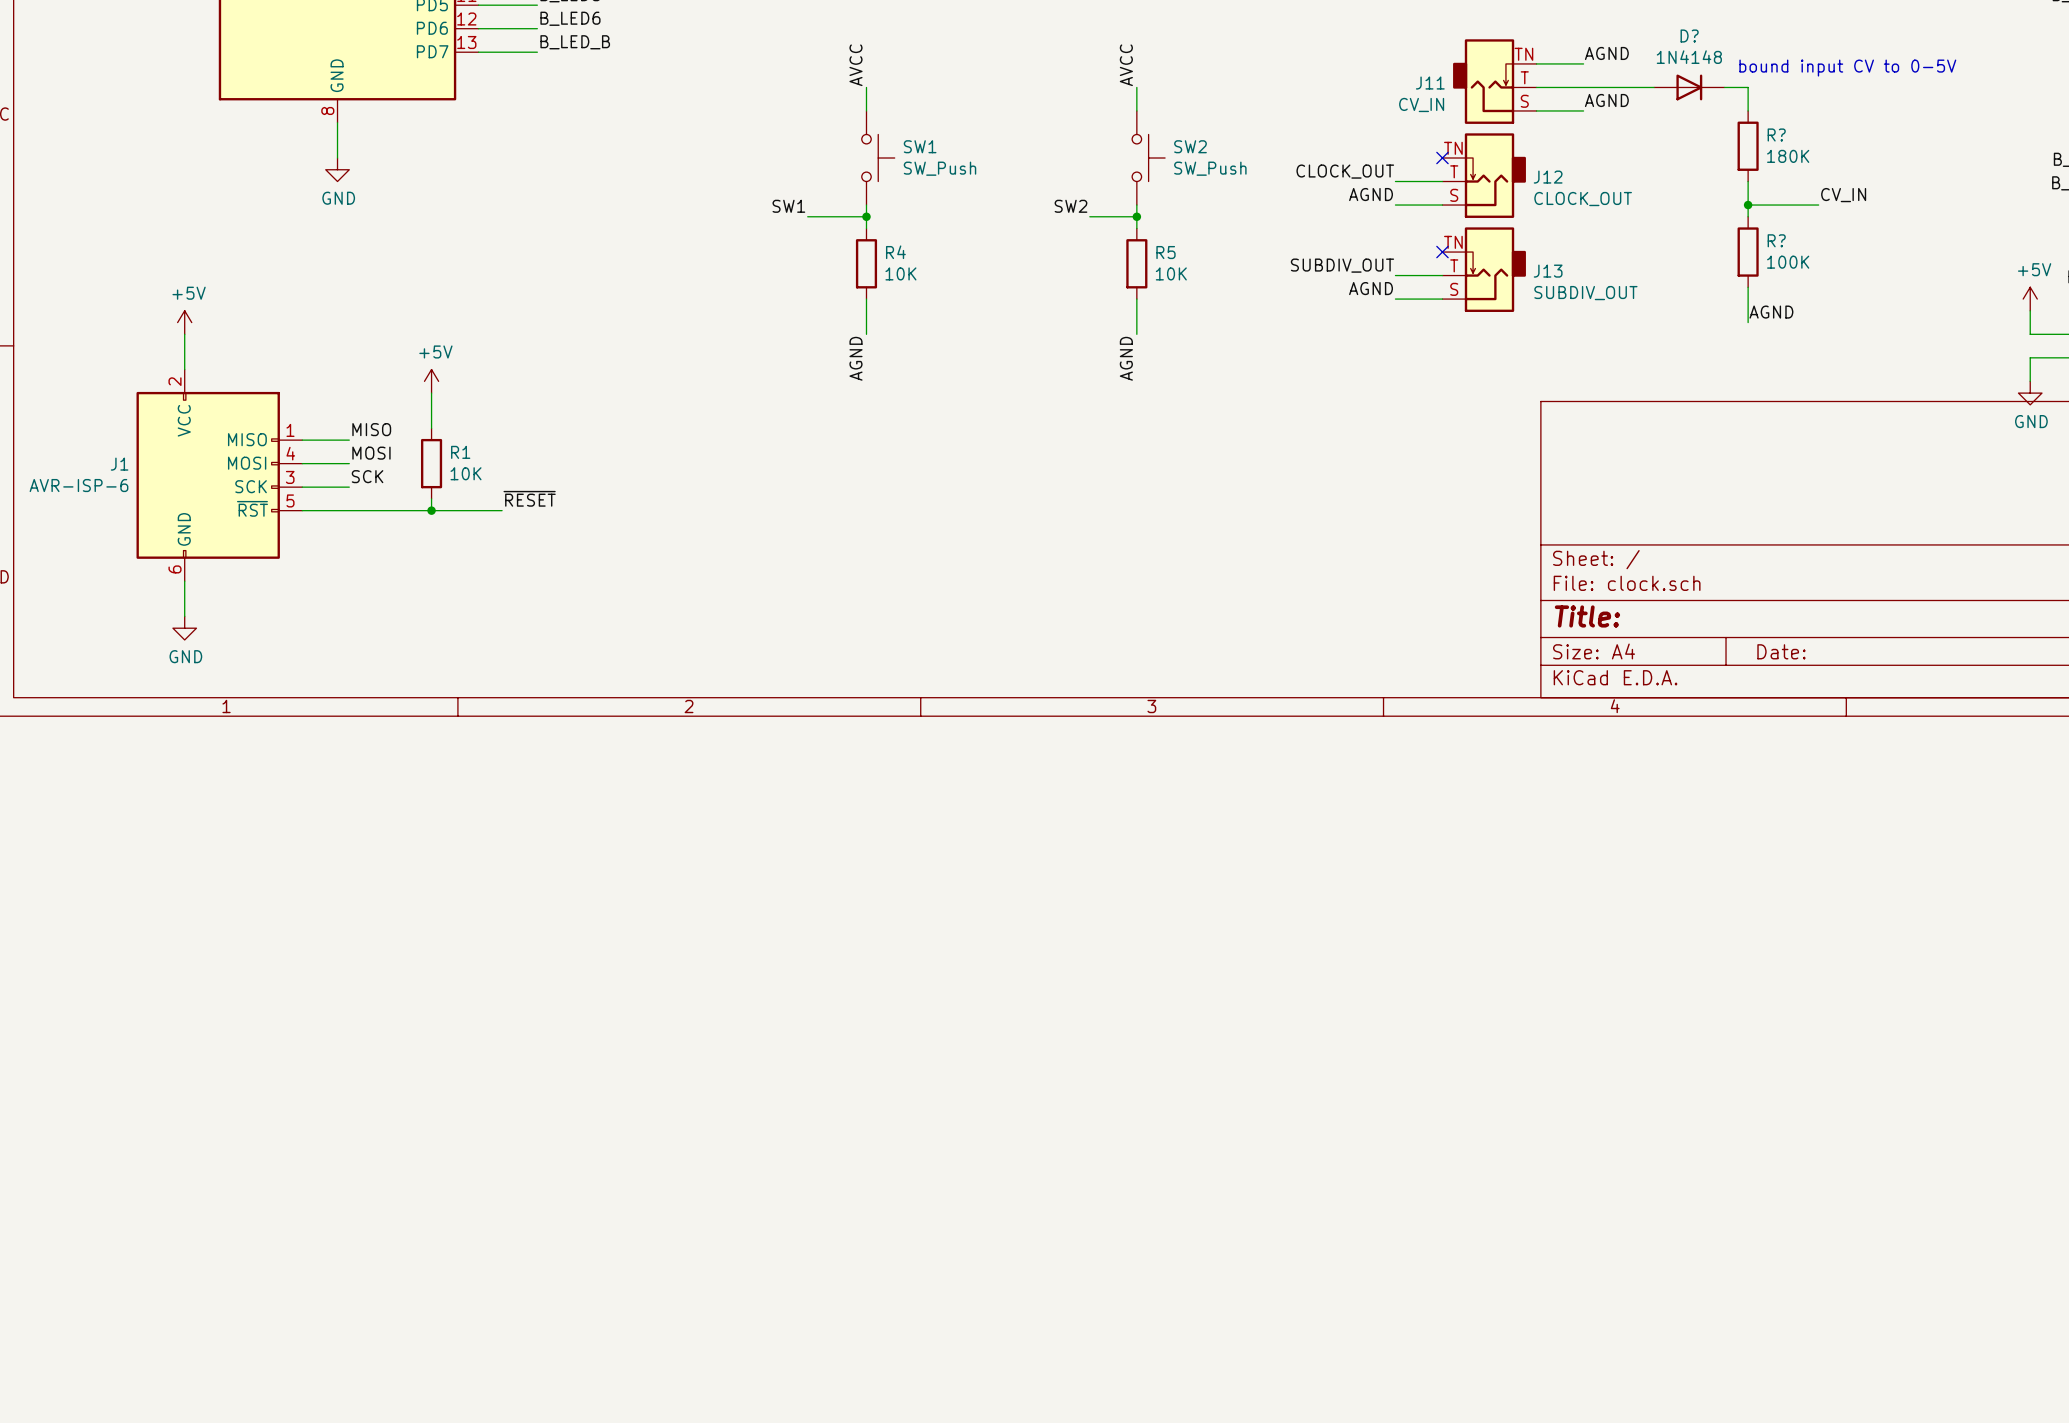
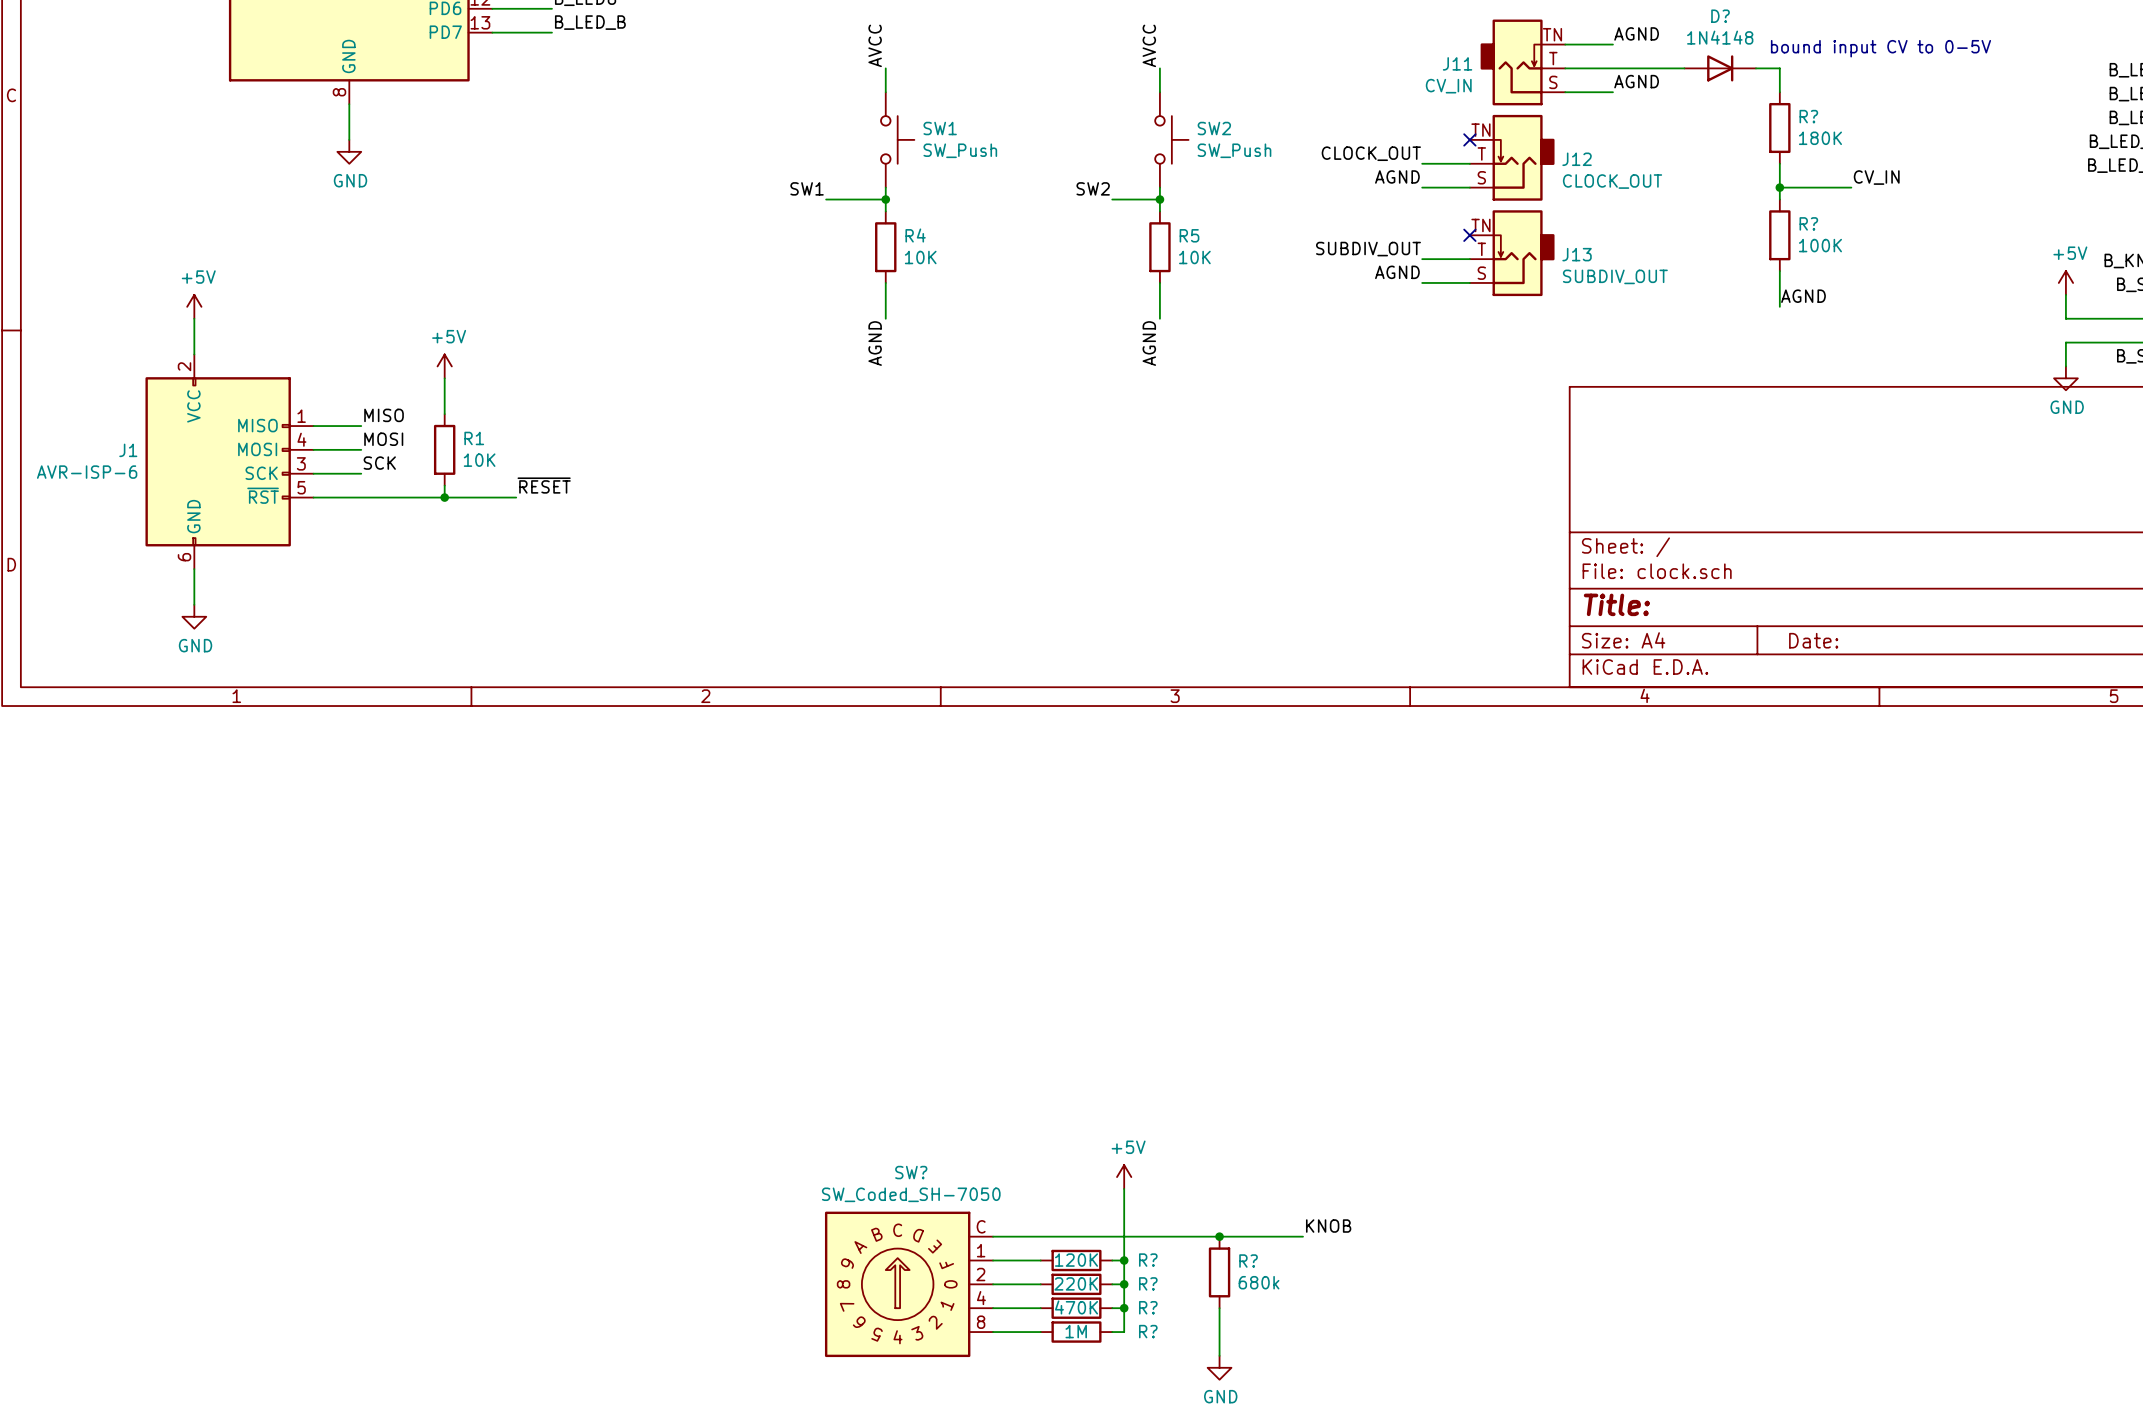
power symbol: none -> +5V (1124, 1177)
wire: none -> (1124, 1188) (1124, 1332) (1112, 1332)
label: none -> KNOB (1328, 1226)
wire: none -> (993, 1236) (1303, 1236)
junction: none -> (1219, 1236)
wire: none -> (993, 1260) (1040, 1260)
R?: none -> 120K (1076, 1260)
wire: none -> (1112, 1260) (1124, 1260)
junction: none -> (1124, 1260)
R?: none -> 680k (1219, 1272)
SW?: none -> SW_Coded_SH-7050 (909, 1284)
wire: none -> (993, 1284) (1040, 1284)
R?: none -> 220K (1076, 1284)
wire: none -> (1112, 1284) (1124, 1284)
junction: none -> (1124, 1284)
wire: none -> (993, 1308) (1040, 1308)
R?: none -> 470K (1076, 1308)
wire: none -> (1112, 1308) (1124, 1308)
junction: none -> (1124, 1308)
wire: none -> (1219, 1308) (1219, 1355)
wire: none -> (993, 1332) (1040, 1332)
R?: none -> 1M (1076, 1332)
power symbol: none -> GND (1219, 1367)

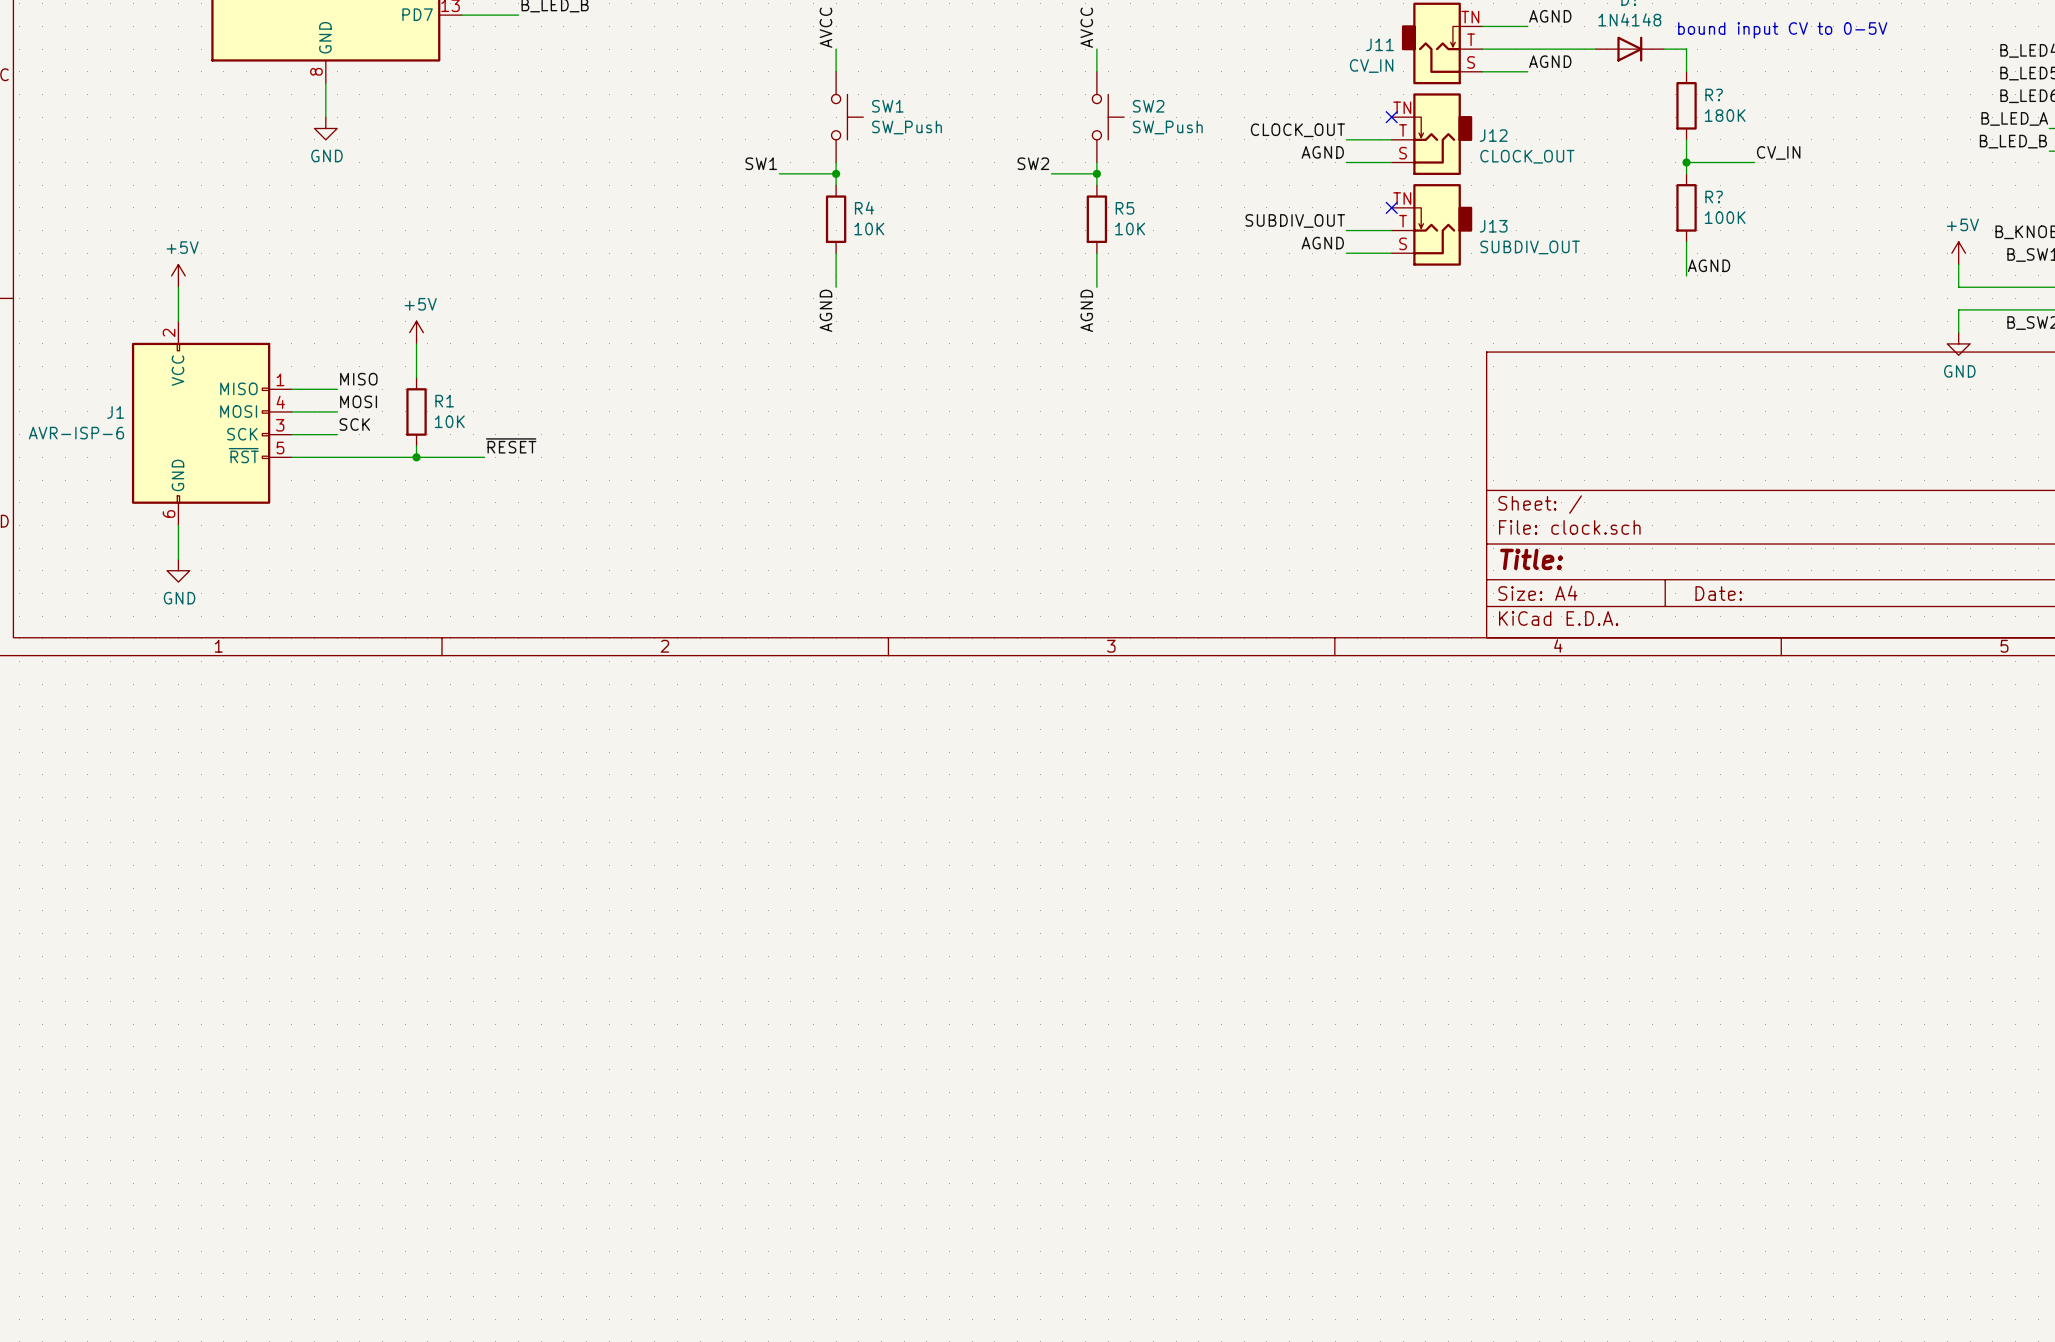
power symbol: +5V (1124, 1177) -> none
wire: (1124, 1188) (1124, 1332) (1112, 1332) -> none
label: KNOB (1328, 1226) -> none
wire: (993, 1236) (1303, 1236) -> none
junction: (1219, 1236) -> none
wire: (993, 1260) (1040, 1260) -> none
R?: 120K (1076, 1260) -> none
wire: (1112, 1260) (1124, 1260) -> none
junction: (1124, 1260) -> none
R?: 680k (1219, 1272) -> none
SW?: SW_Coded_SH-7050 (909, 1284) -> none
wire: (993, 1284) (1040, 1284) -> none
R?: 220K (1076, 1284) -> none
wire: (1112, 1284) (1124, 1284) -> none
junction: (1124, 1284) -> none
wire: (993, 1308) (1040, 1308) -> none
R?: 470K (1076, 1308) -> none
wire: (1112, 1308) (1124, 1308) -> none
junction: (1124, 1308) -> none
wire: (1219, 1308) (1219, 1355) -> none
wire: (993, 1332) (1040, 1332) -> none
R?: 1M (1076, 1332) -> none
power symbol: GND (1219, 1367) -> none

